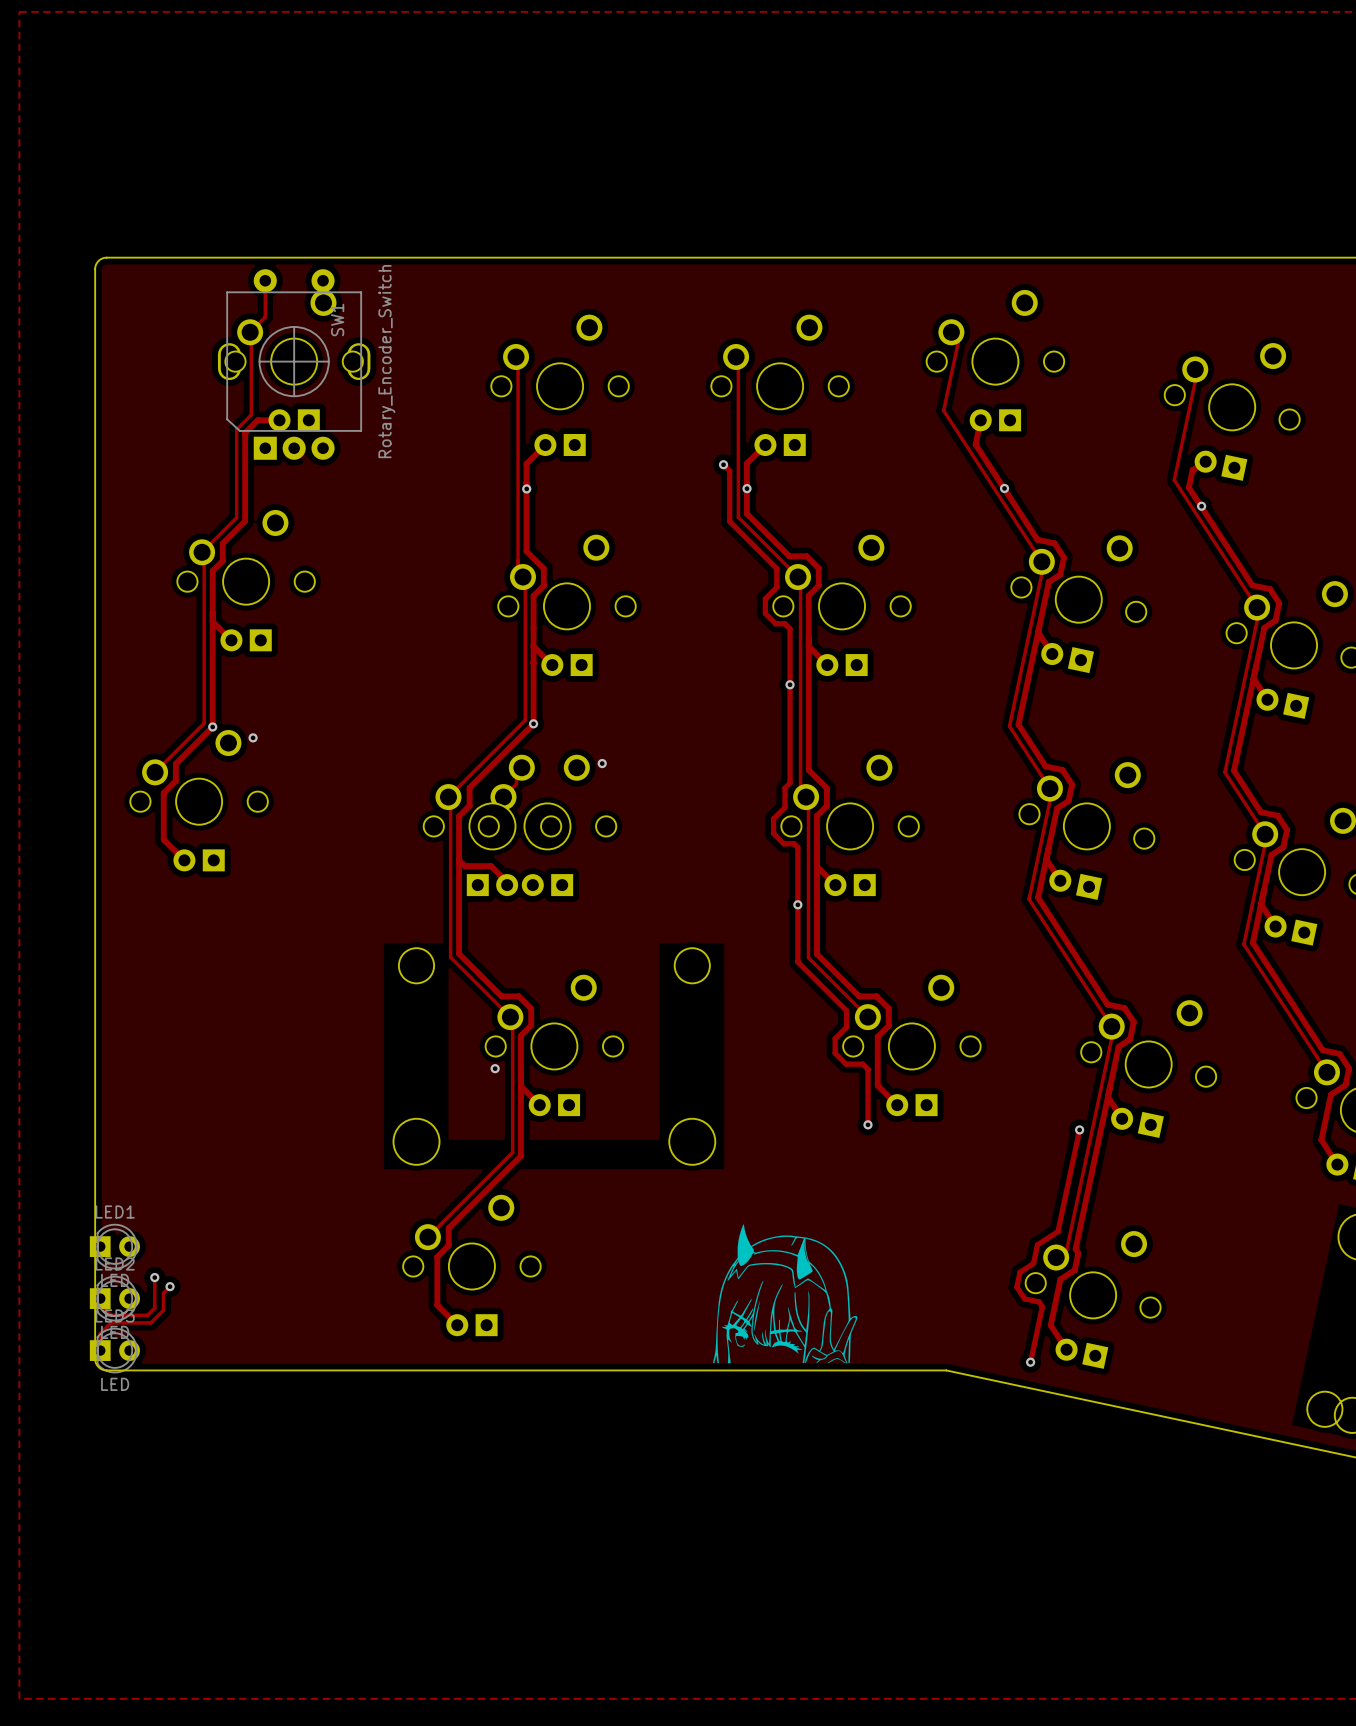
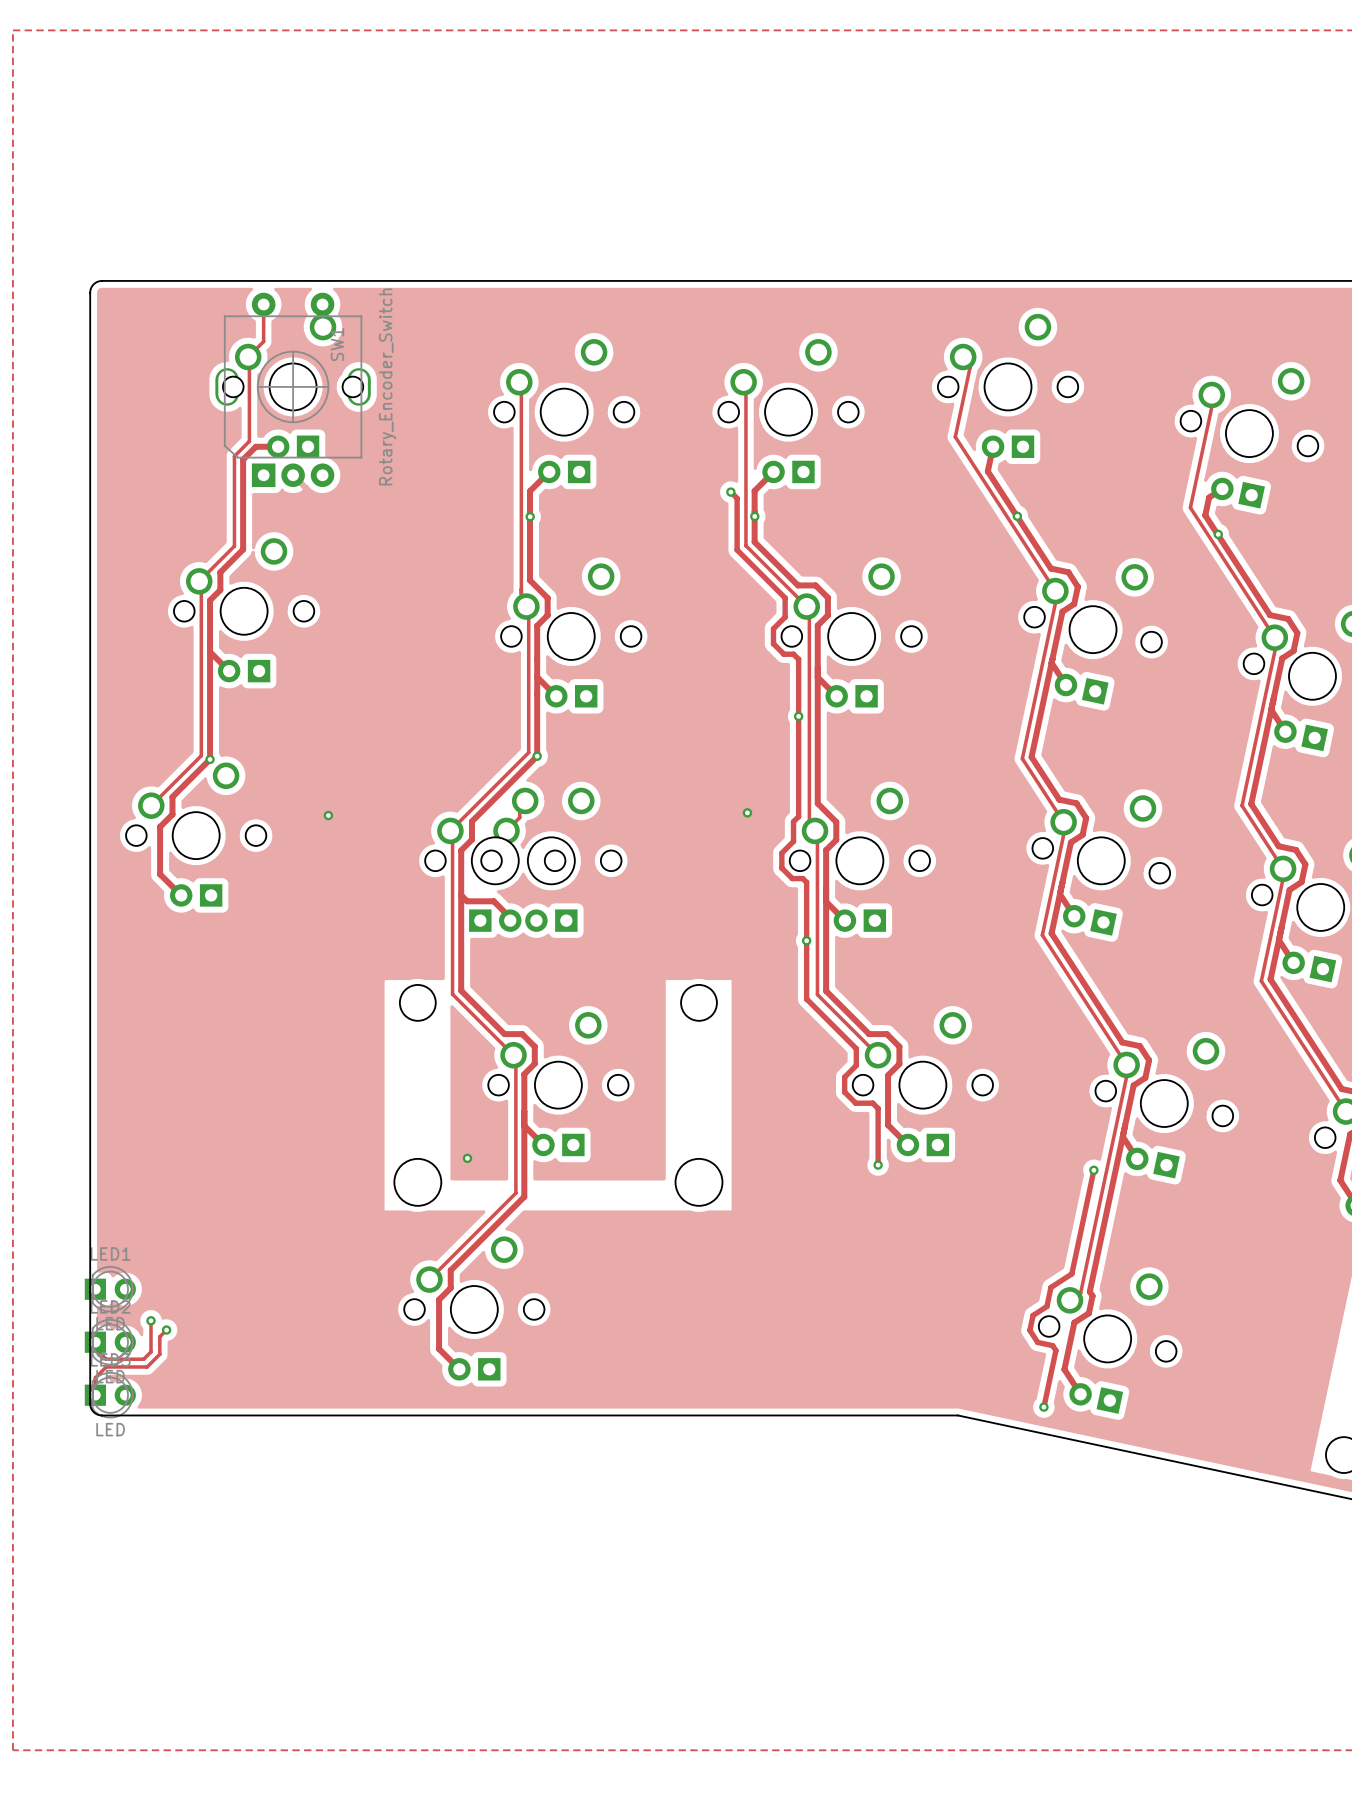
via: (253, 737) -> none
via: (602, 763) -> none
via: none -> (747, 812)
via: none -> (328, 815)
via position: (495, 1068) -> (467, 1158)
drawing: [712, 1224, 858, 1364] -> none

